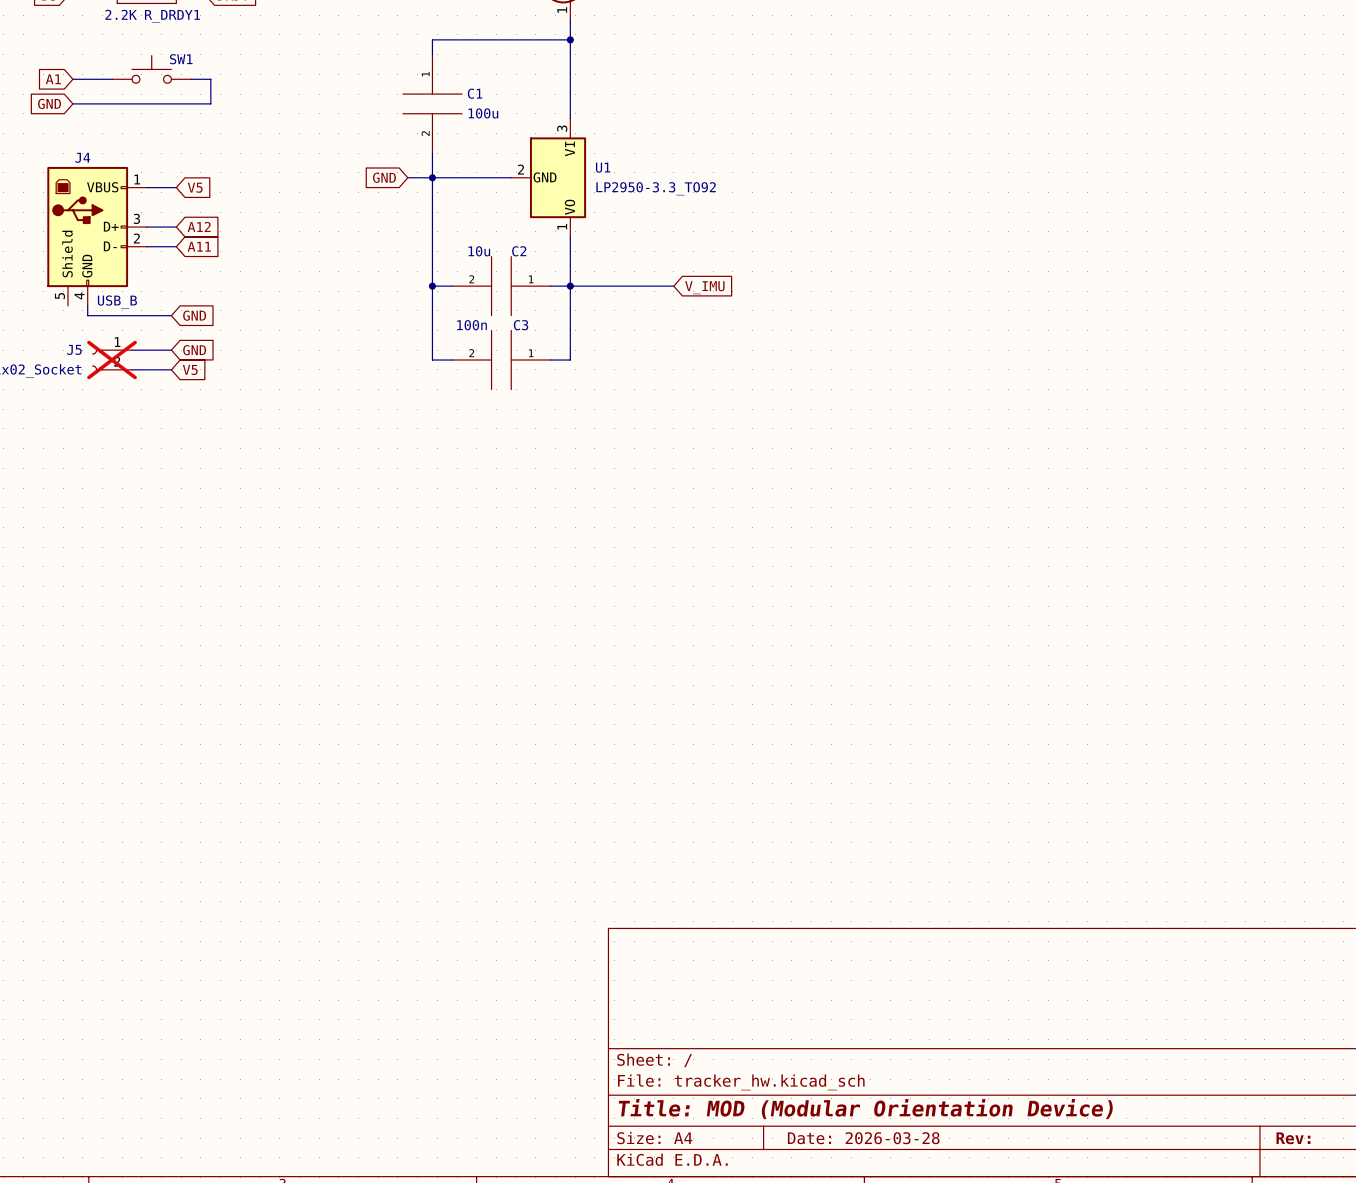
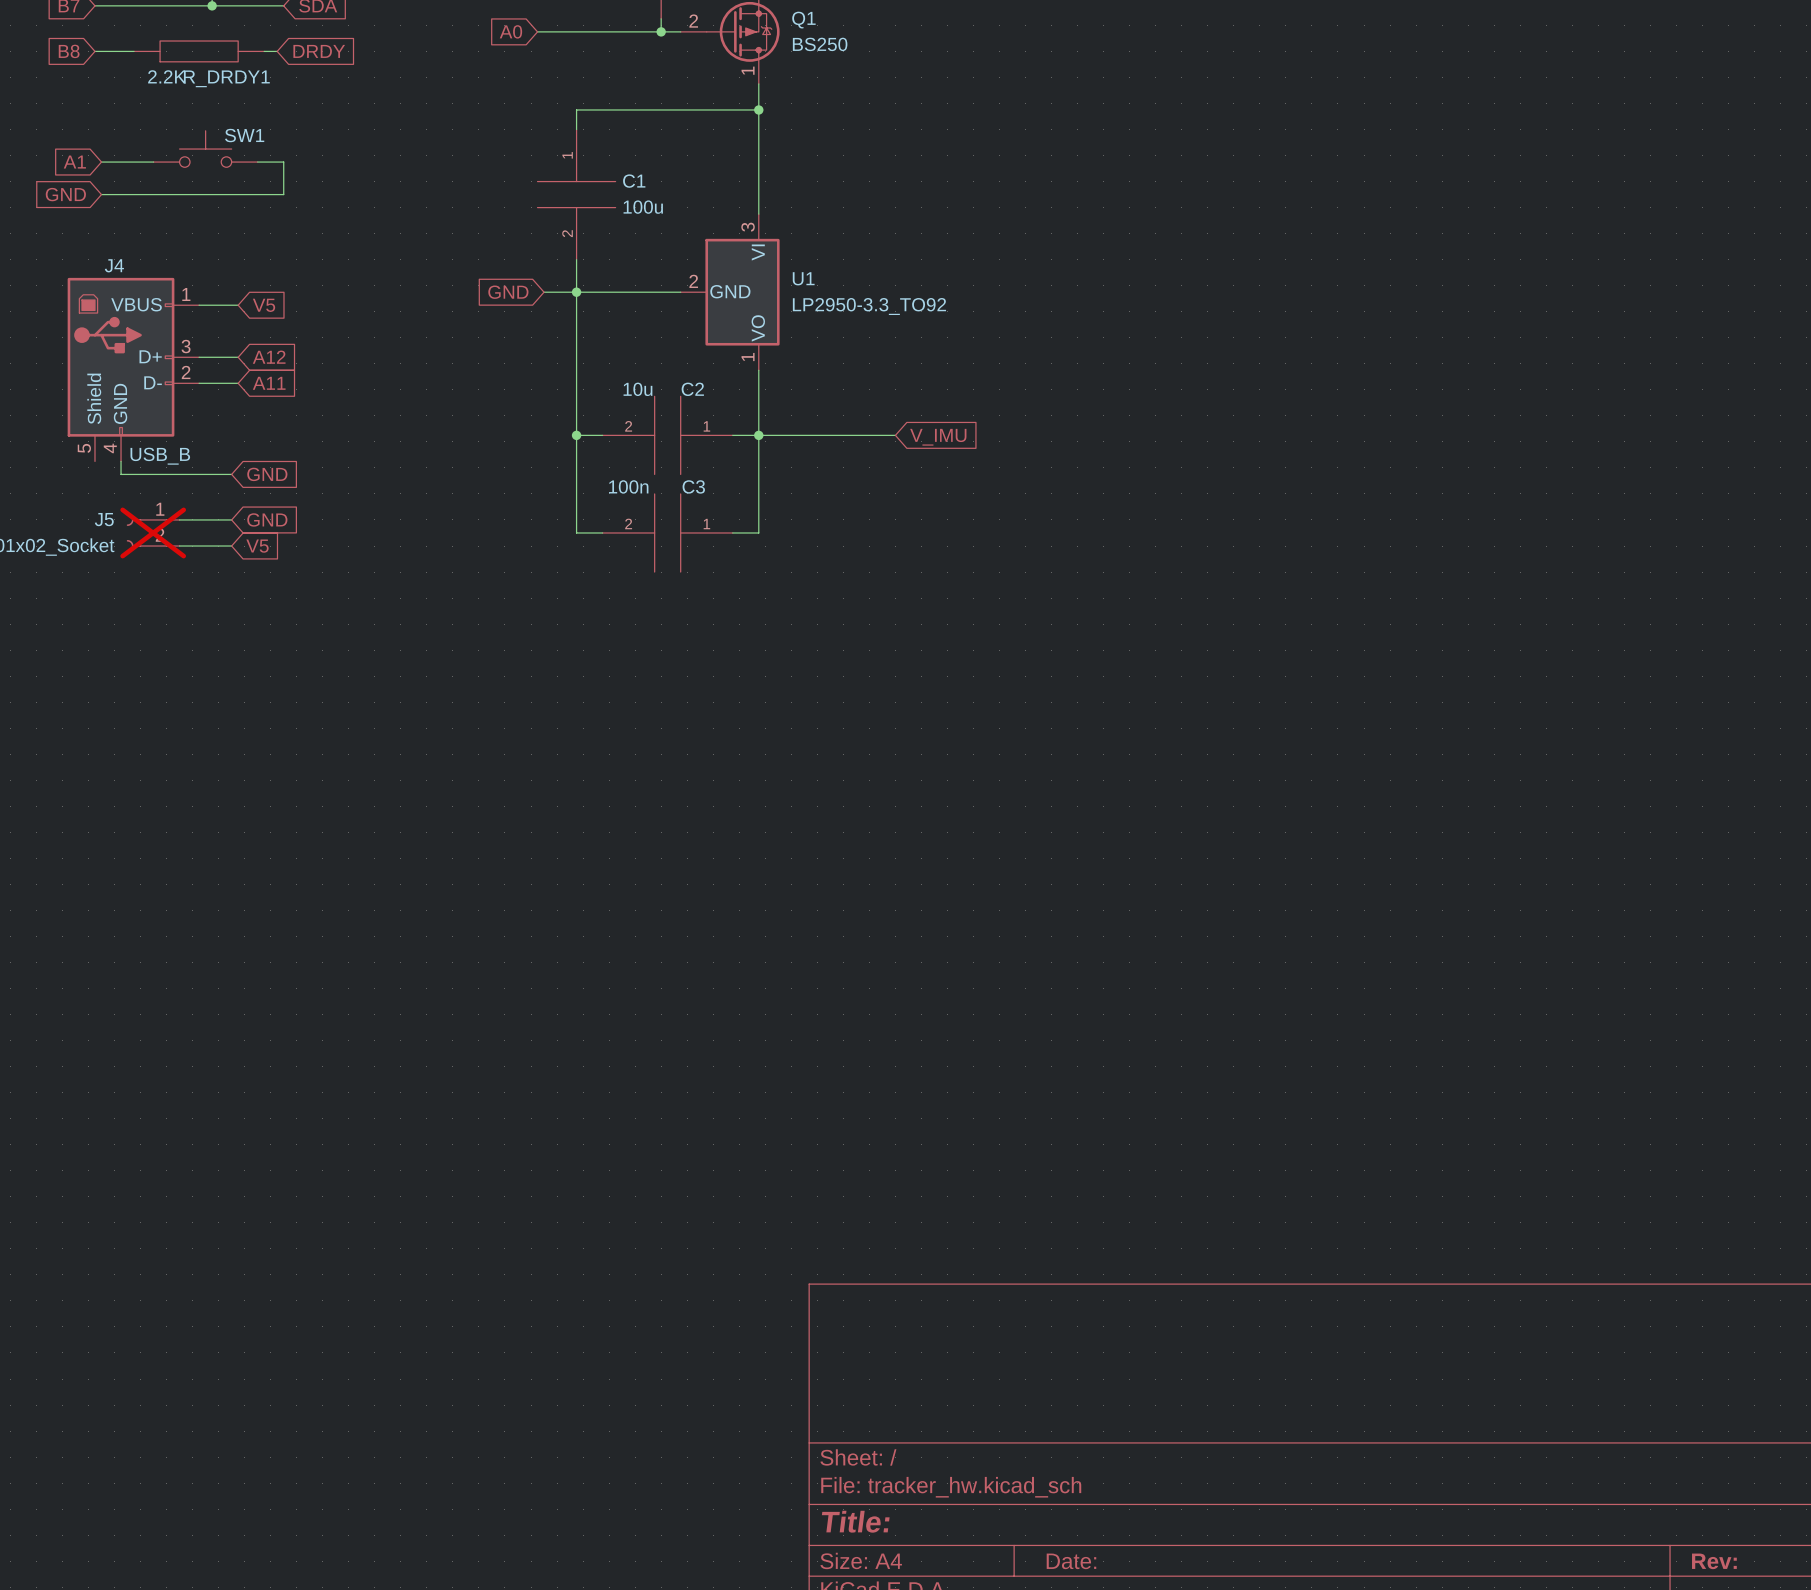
title block: Title: MOD (Modular Orientation Device) (865, 1109) -> Title: (855, 1521)
title block: Date: 2026-03-28 (863, 1138) -> Date: (1071, 1561)

